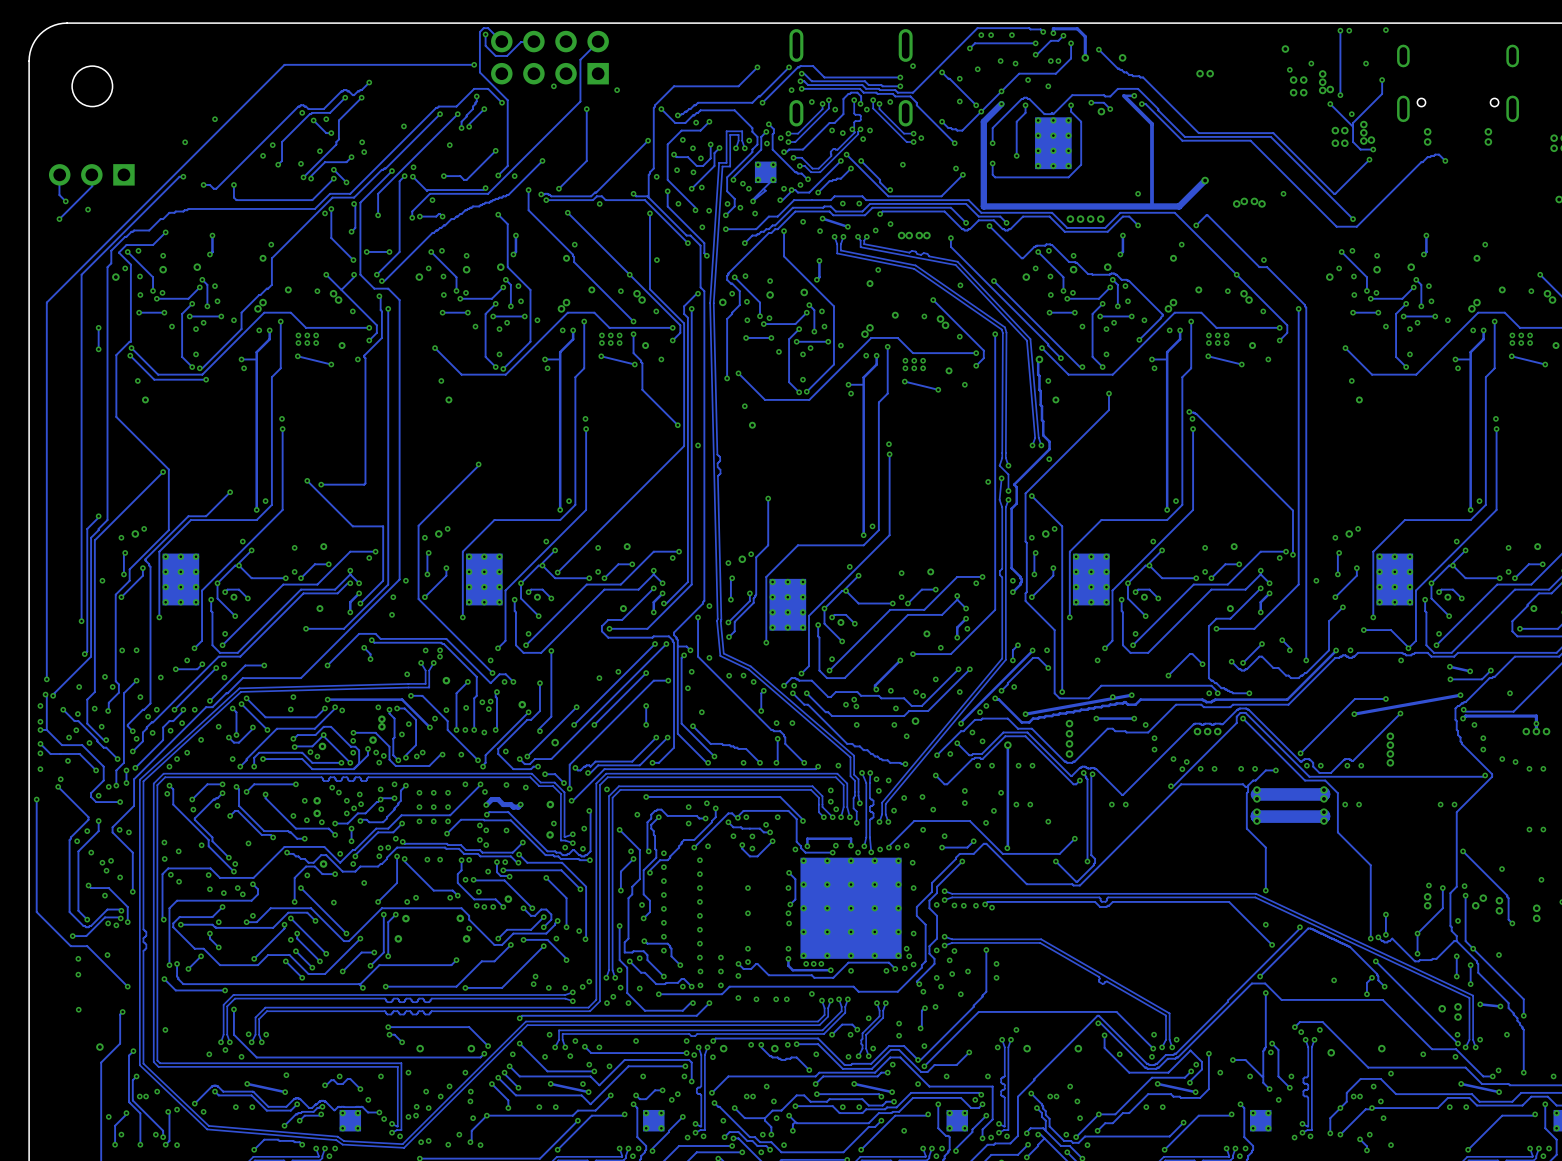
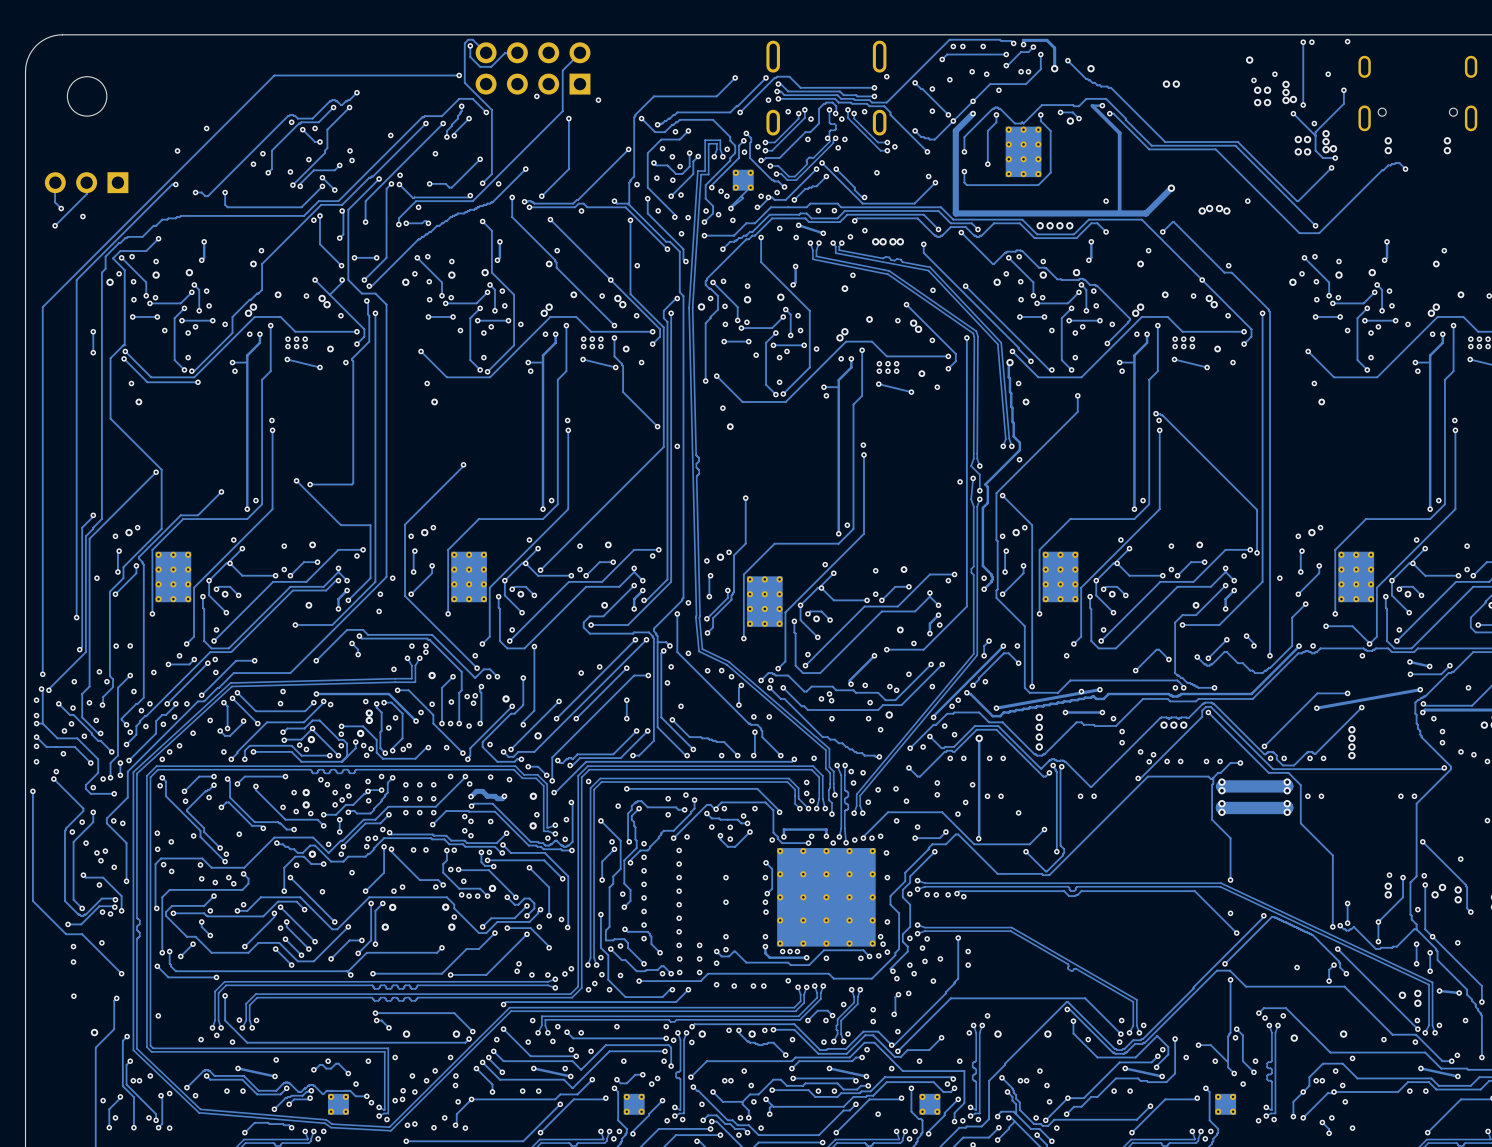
via: (1048, 86) -> none
via: (842, 133) -> none
via: (488, 871) -> none

